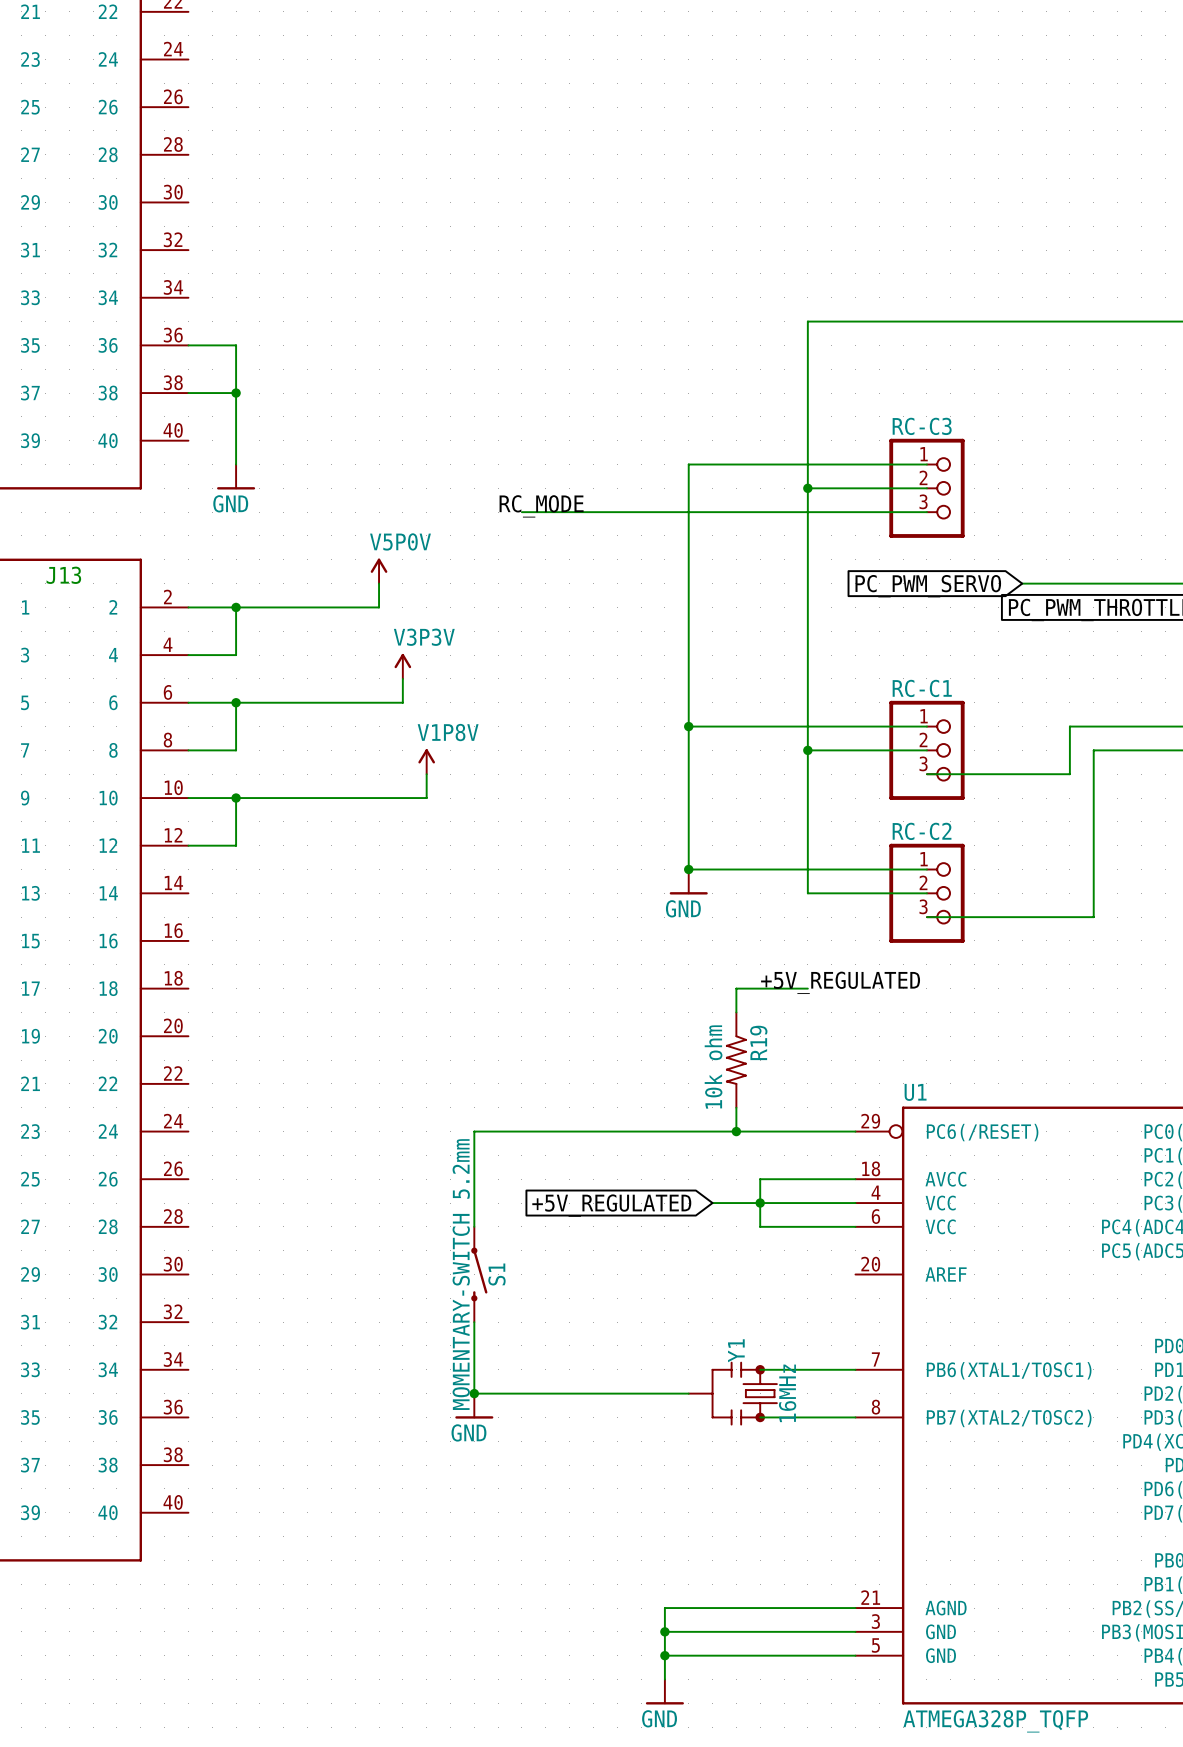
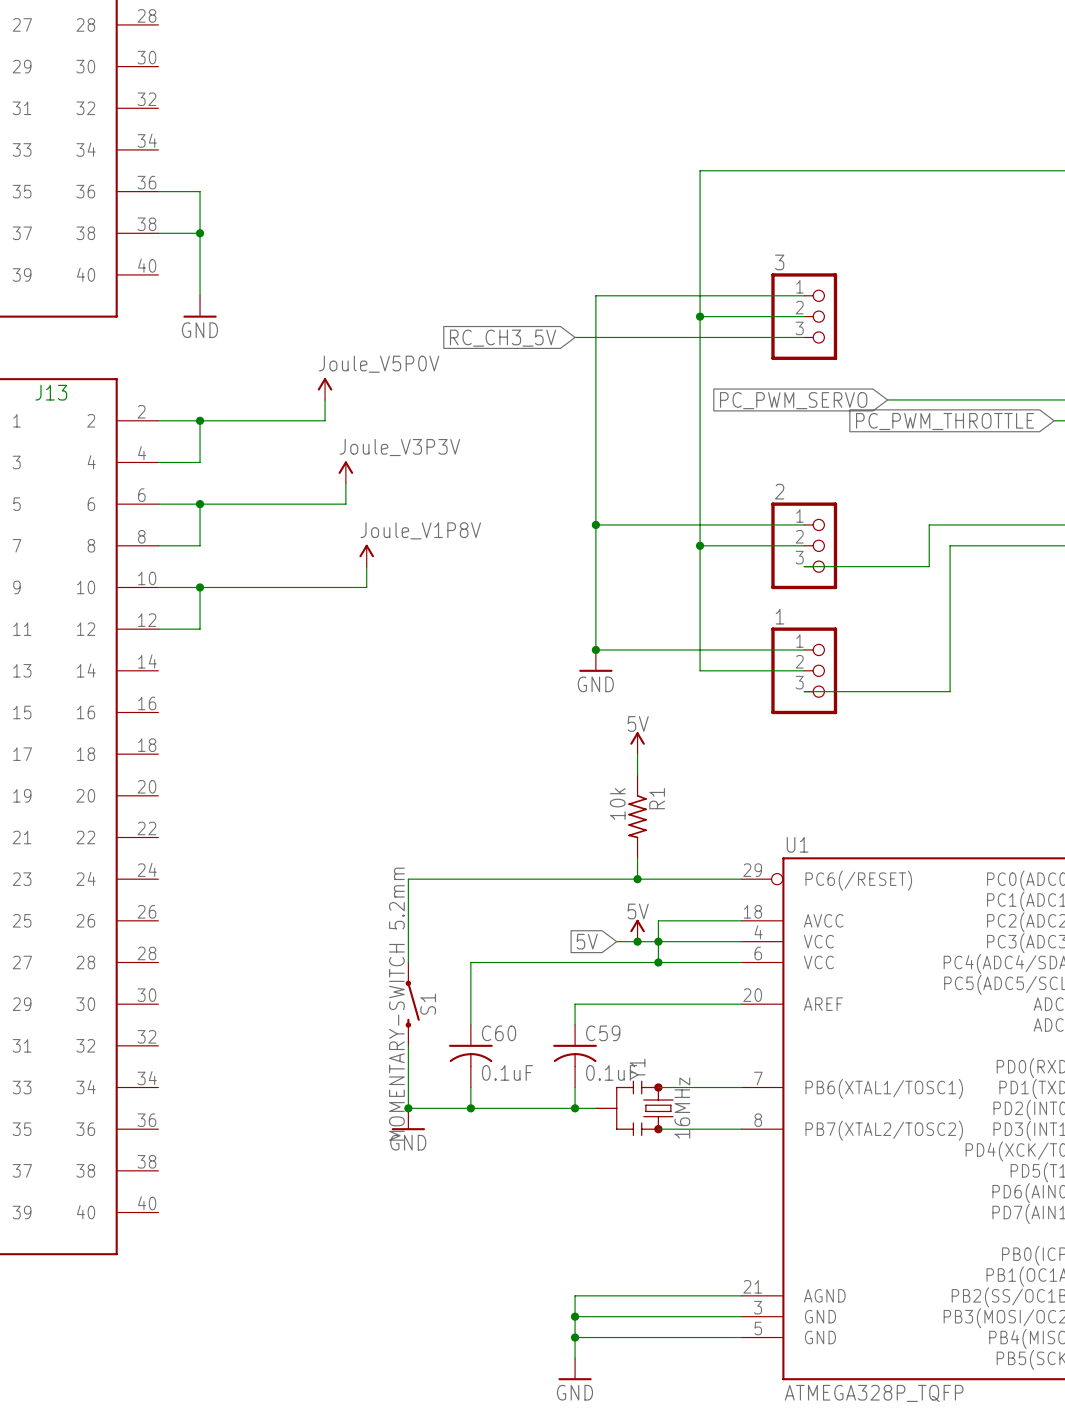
RC-C3 name: RC-C3 (922, 426) -> 3 (779, 262)
label: RC_MODE (541, 506) -> none
wire: (521, 512) (664, 512) -> none
global label: none -> RC_CH3_5V (503, 338)
power symbol: V5P0V (379, 571) -> Joule_V5P0V (325, 389)
power symbol: V3P3V (402, 666) -> Joule_V3P3V (345, 472)
RC-C1 name: RC-C1 (922, 688) -> 2 (779, 491)
power symbol: V1P8V (426, 761) -> Joule_V1P8V (366, 555)
RC-C2 name: RC-C2 (922, 831) -> 1 (780, 616)
power symbol: none -> 5V (637, 743)
label: +5V_REGULATED (840, 982) -> none
wire: (736, 988) (807, 988) -> none
R19 name: R19 (758, 1042) -> R1 (657, 798)
R19 value: 10k ohm (713, 1066) -> 10k (617, 803)
power symbol: none -> 5V (637, 930)
junction: none -> (637, 941)
global label: +5V_REGULATED (611, 1205) -> 5V (587, 941)
wire: none -> (658, 962) (470, 962) (470, 1025)
junction: none -> (658, 962)
wire: none -> (741, 1004) (575, 1004) (575, 1025)
C60: none -> 0.1uF (470, 1056)
C59: none -> 0.1uF (575, 1056)
wire: none -> (470, 1087) (470, 1108)
wire: none -> (575, 1087) (575, 1108)
junction: none -> (470, 1108)
junction: none -> (575, 1108)

